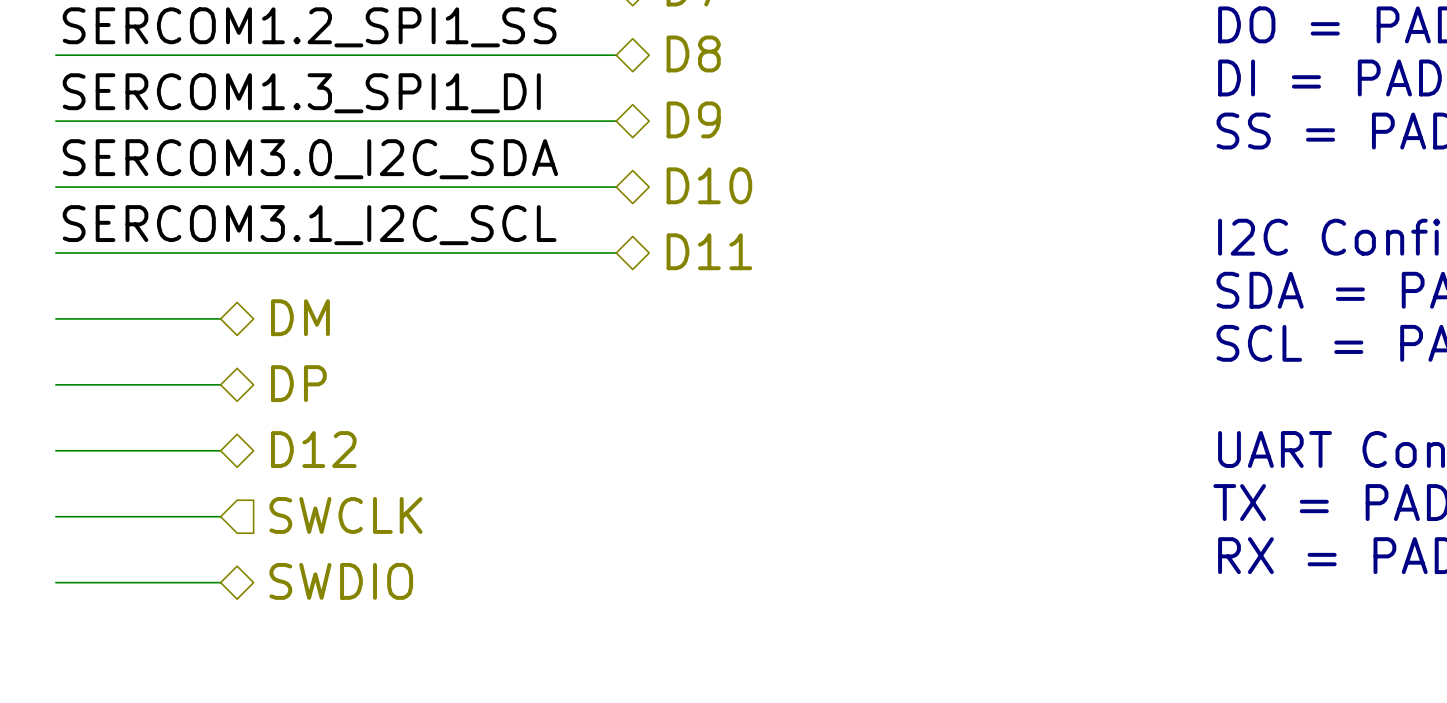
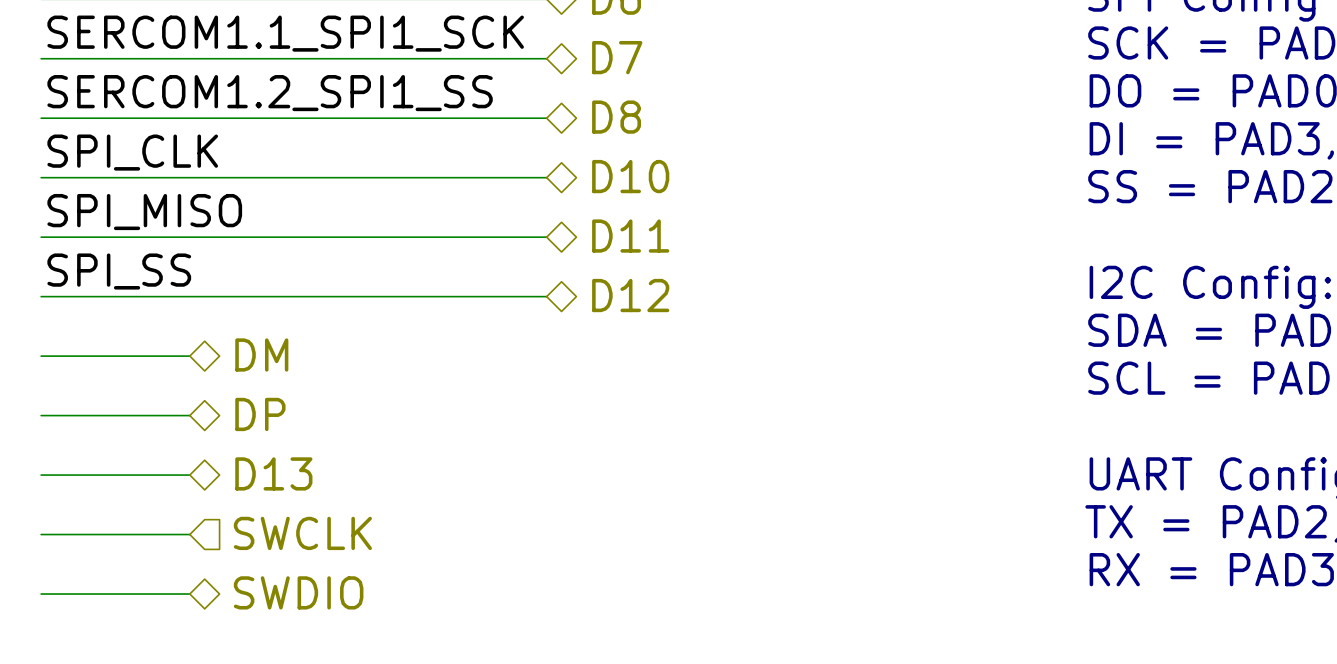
label: SERCOM1.3_SPI1_DI (301, 93) -> SPI_CLK (132, 152)
hierarchical label: D9 (693, 119) -> D10 (630, 176)
label: SERCOM3.0_I2C_SDA (310, 159) -> SPI_MISO (144, 212)
hierarchical label: D10 (709, 185) -> D11 (630, 236)
label: SERCOM3.1_I2C_SCL (309, 225) -> SPI_SS (119, 271)
hierarchical label: D11 (709, 251) -> D12 (630, 295)
hierarchical label: D12 (313, 449) -> D13 (273, 473)

